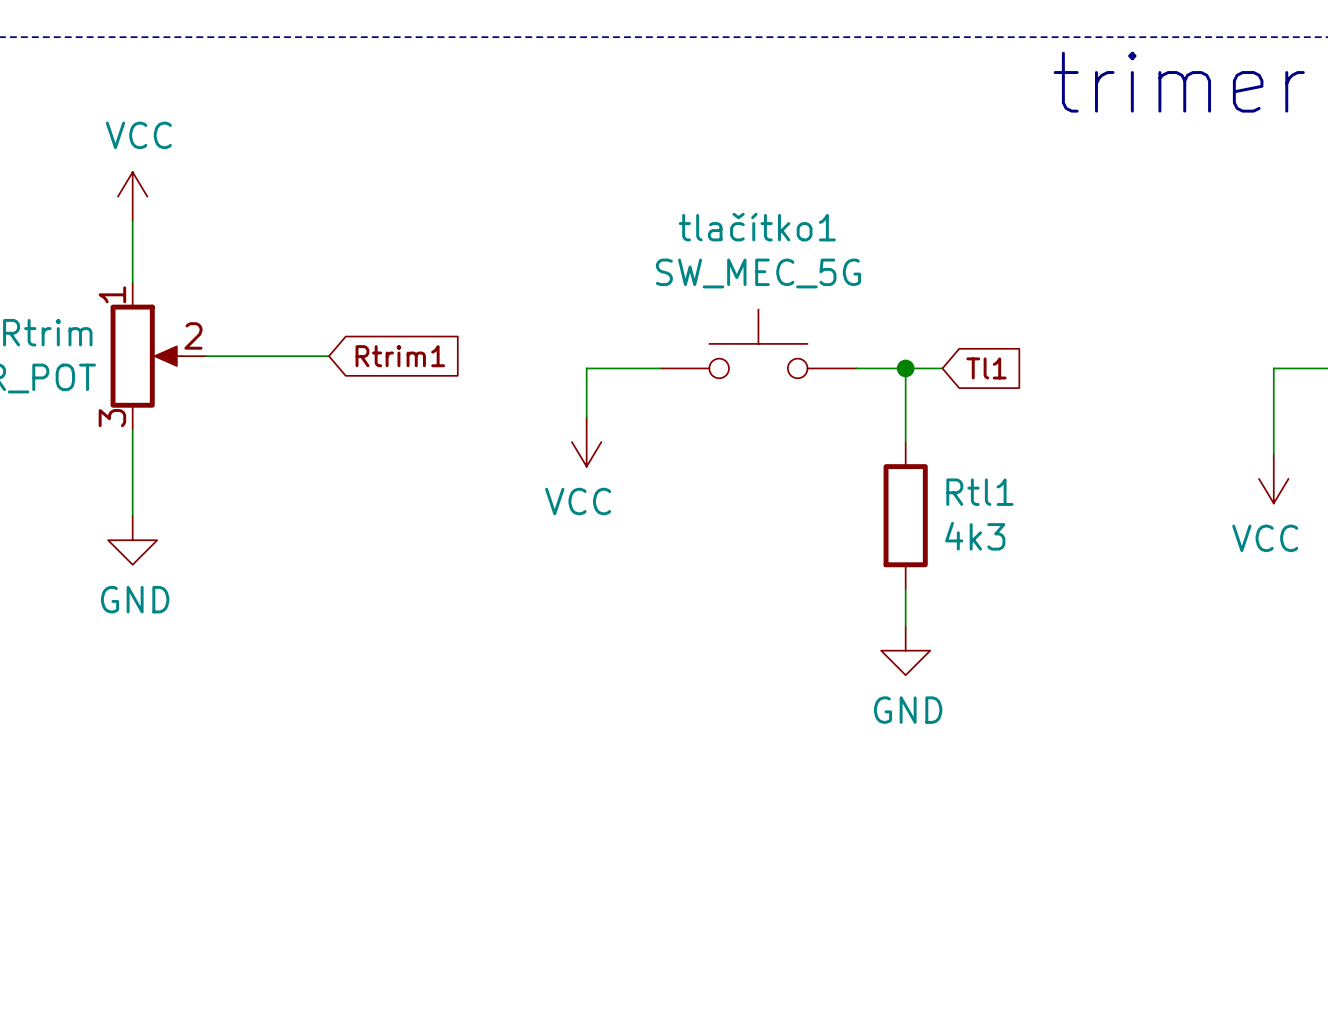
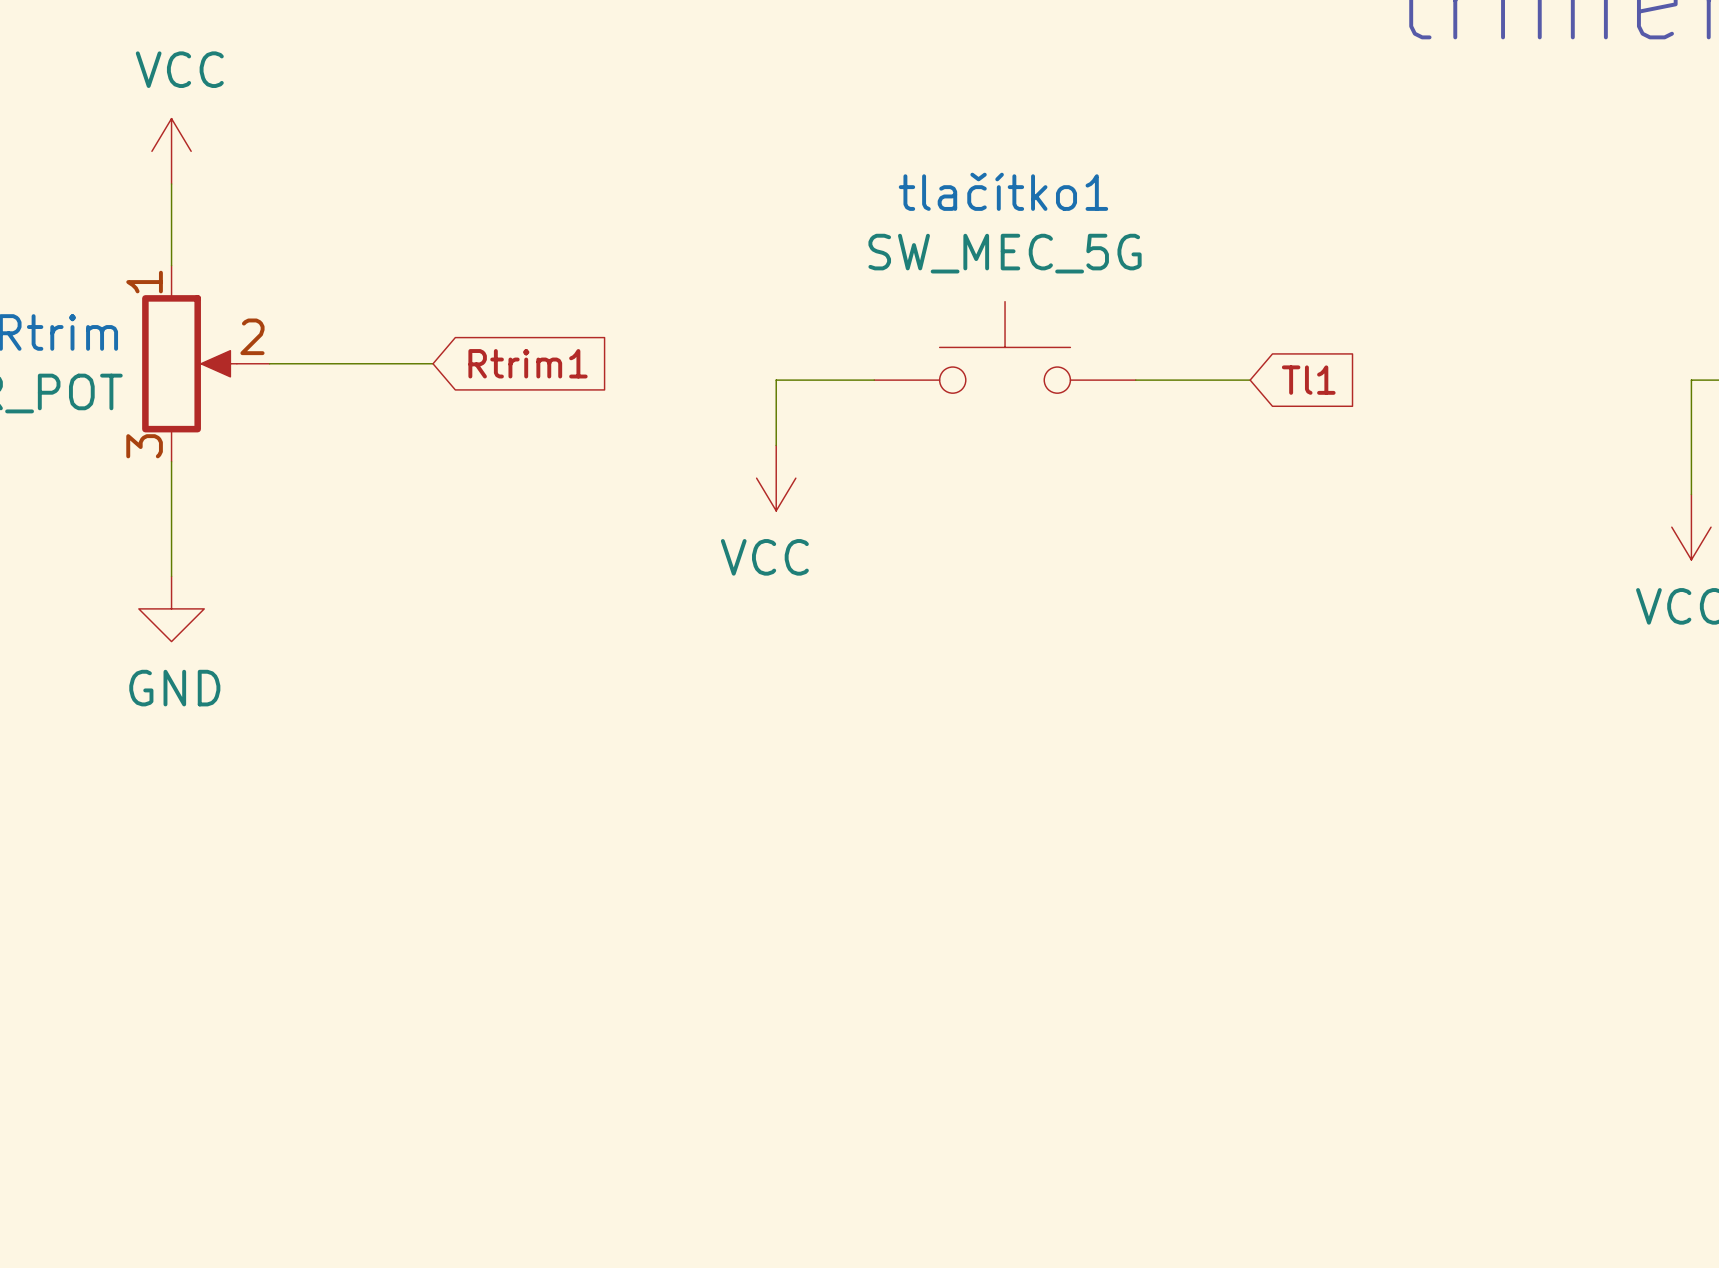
wire: (905, 368) (905, 442) -> none
junction: (905, 368) -> none
Rtl1: 4k3 (905, 515) -> none
wire: (905, 589) (905, 626) -> none
power symbol: GND (905, 650) -> none

